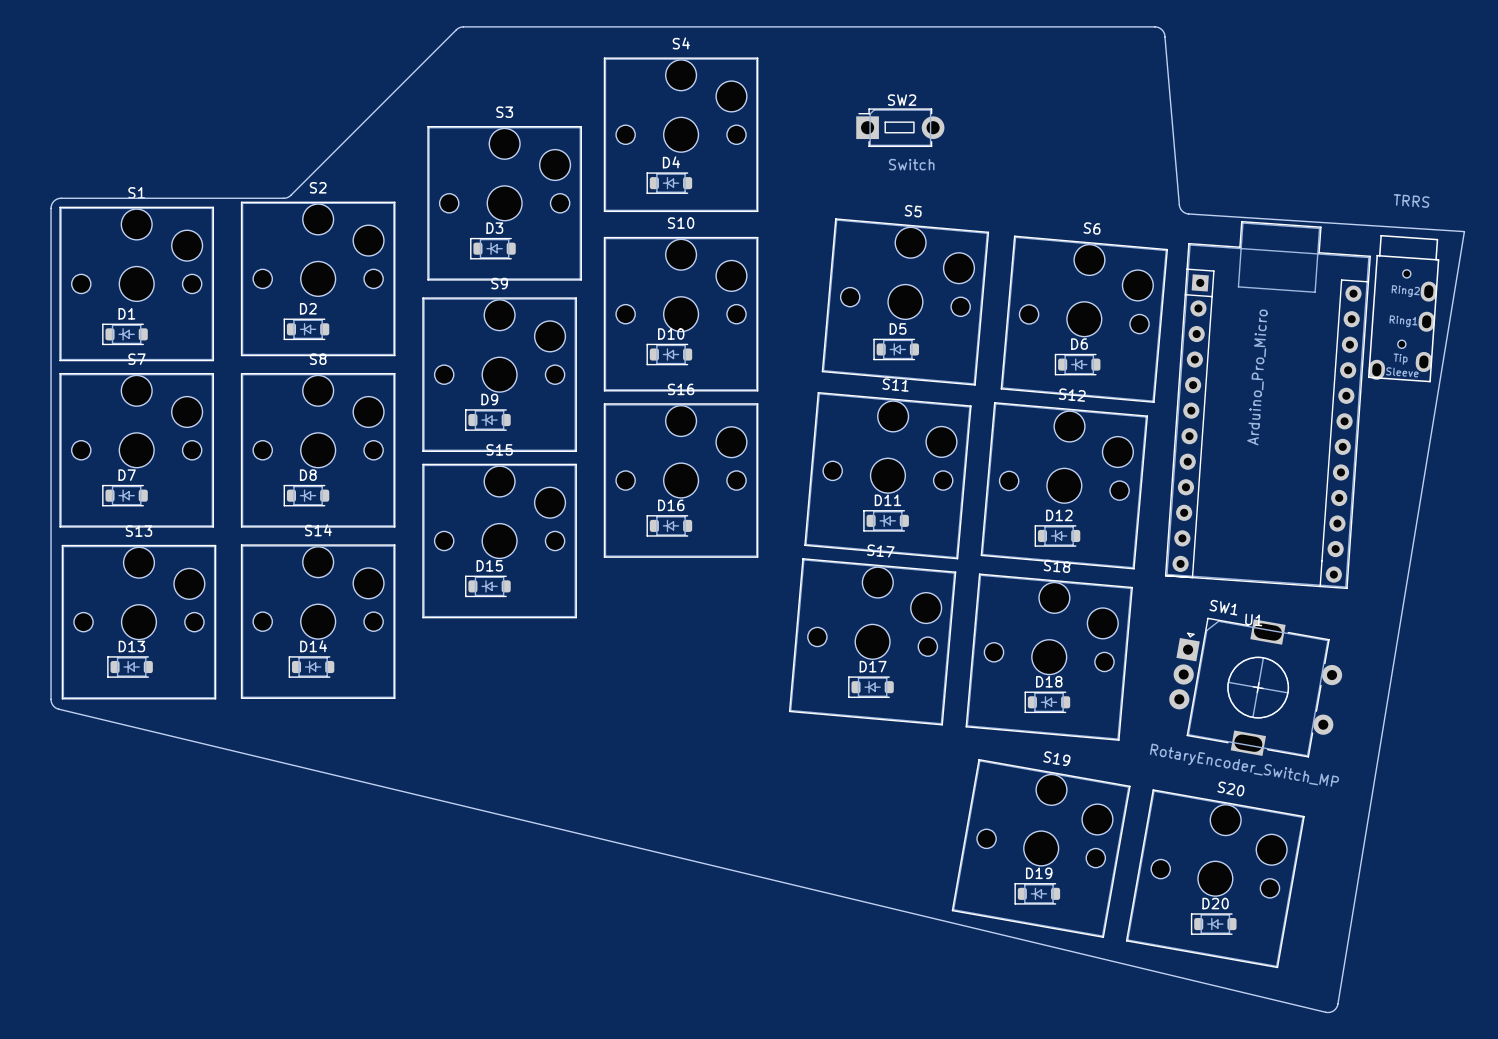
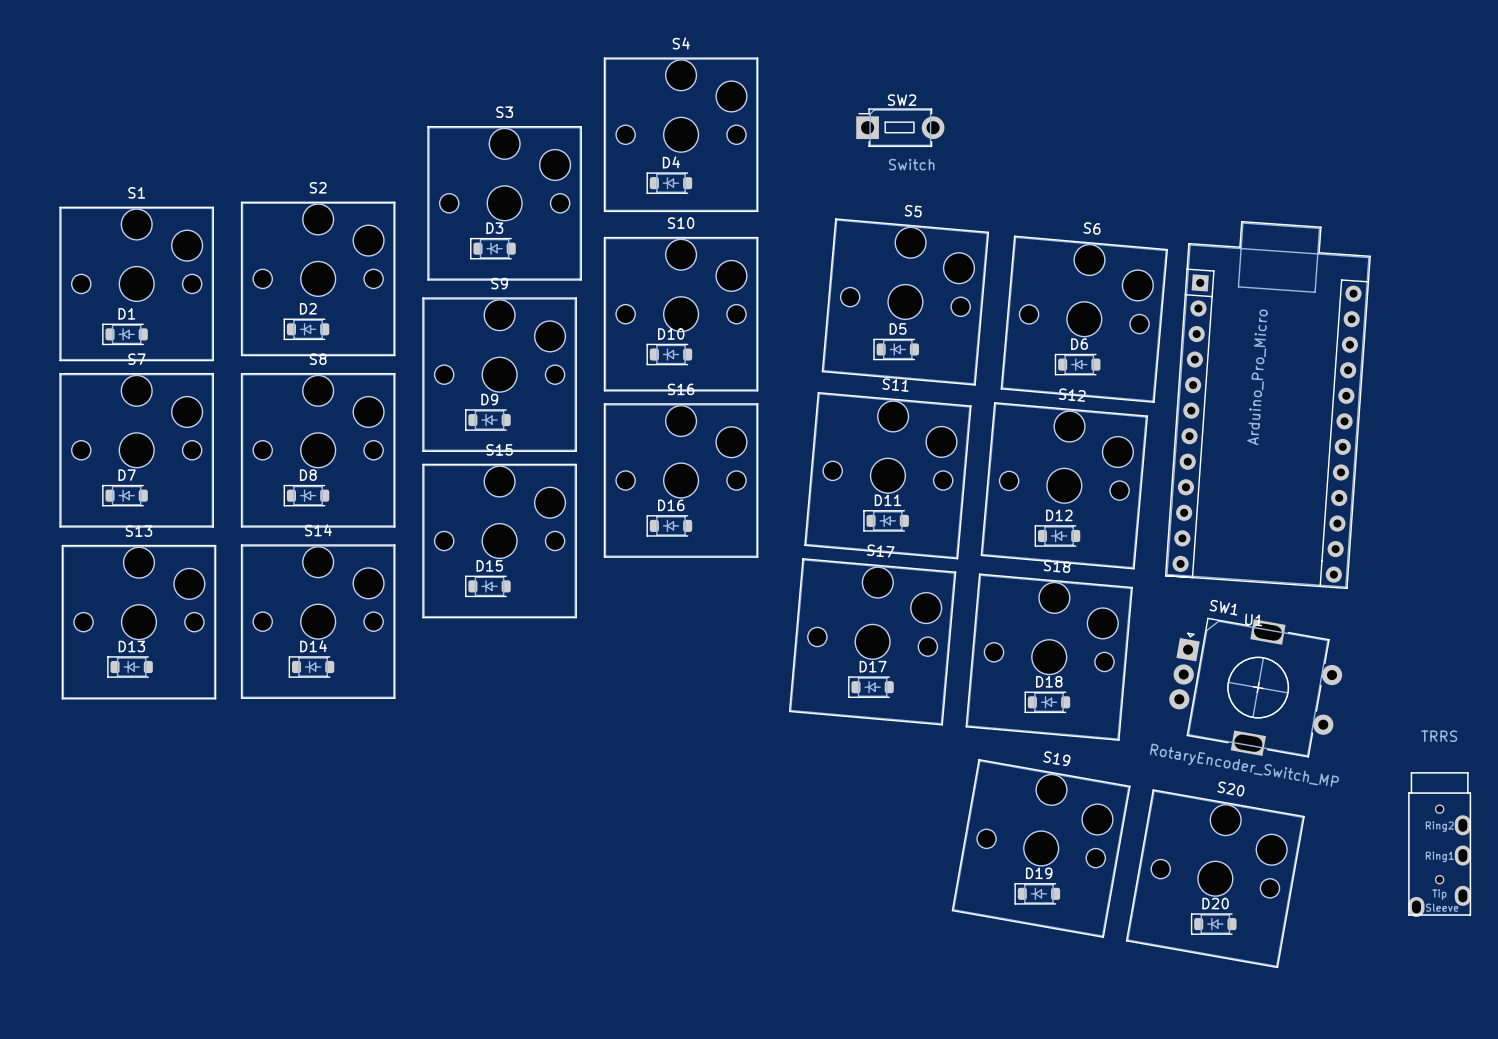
board edge: (463, 26) (1157, 27) (1162, 29) (1164, 35) (1179, 204) (1184, 212) (1464, 231) (1337, 1003) (1334, 1010) (1325, 1012) (58, 709) (53, 706) (51, 699) (51, 208) (52, 202) (61, 198) (287, 197) (456, 29) (463, 26) -> none
part: TRRS (1403, 308) -> none
part: none -> TRRS (1439, 844)

